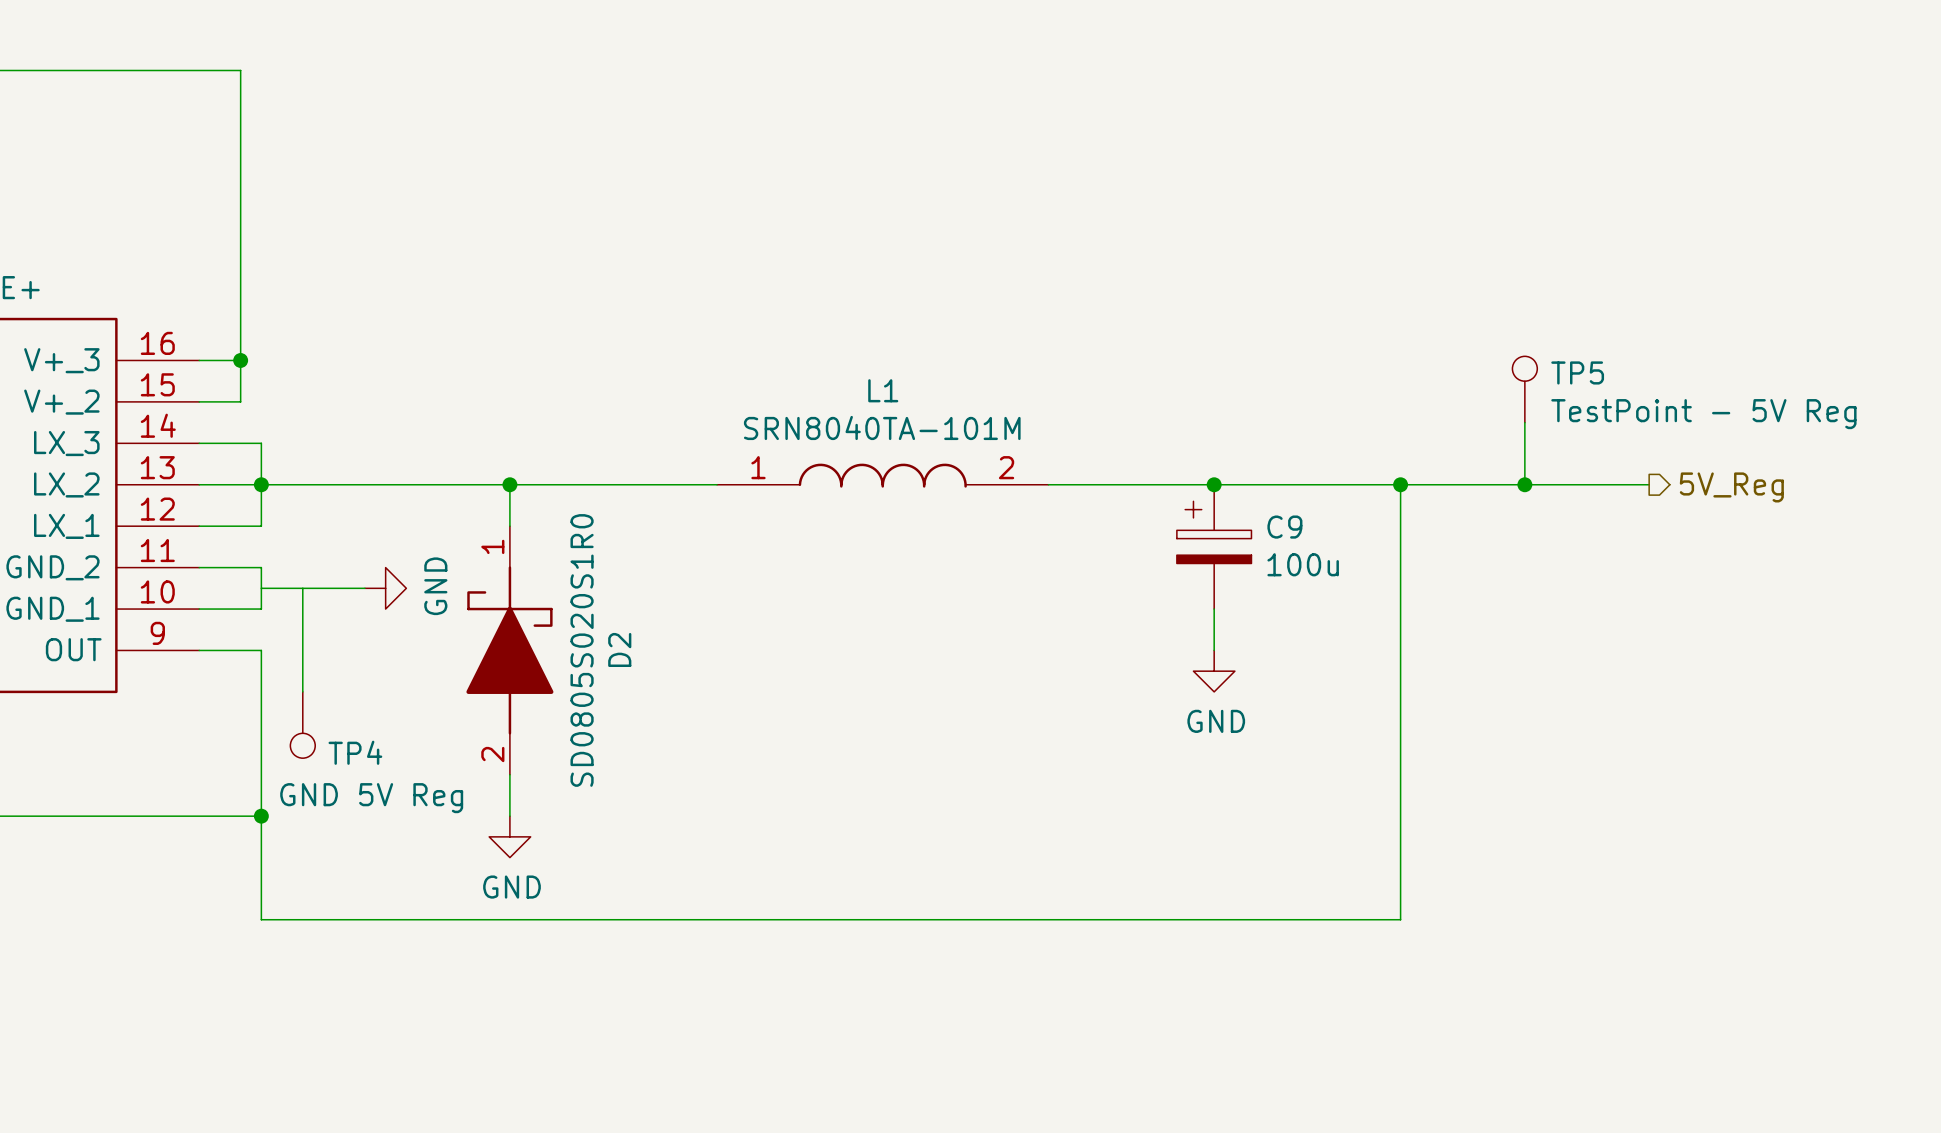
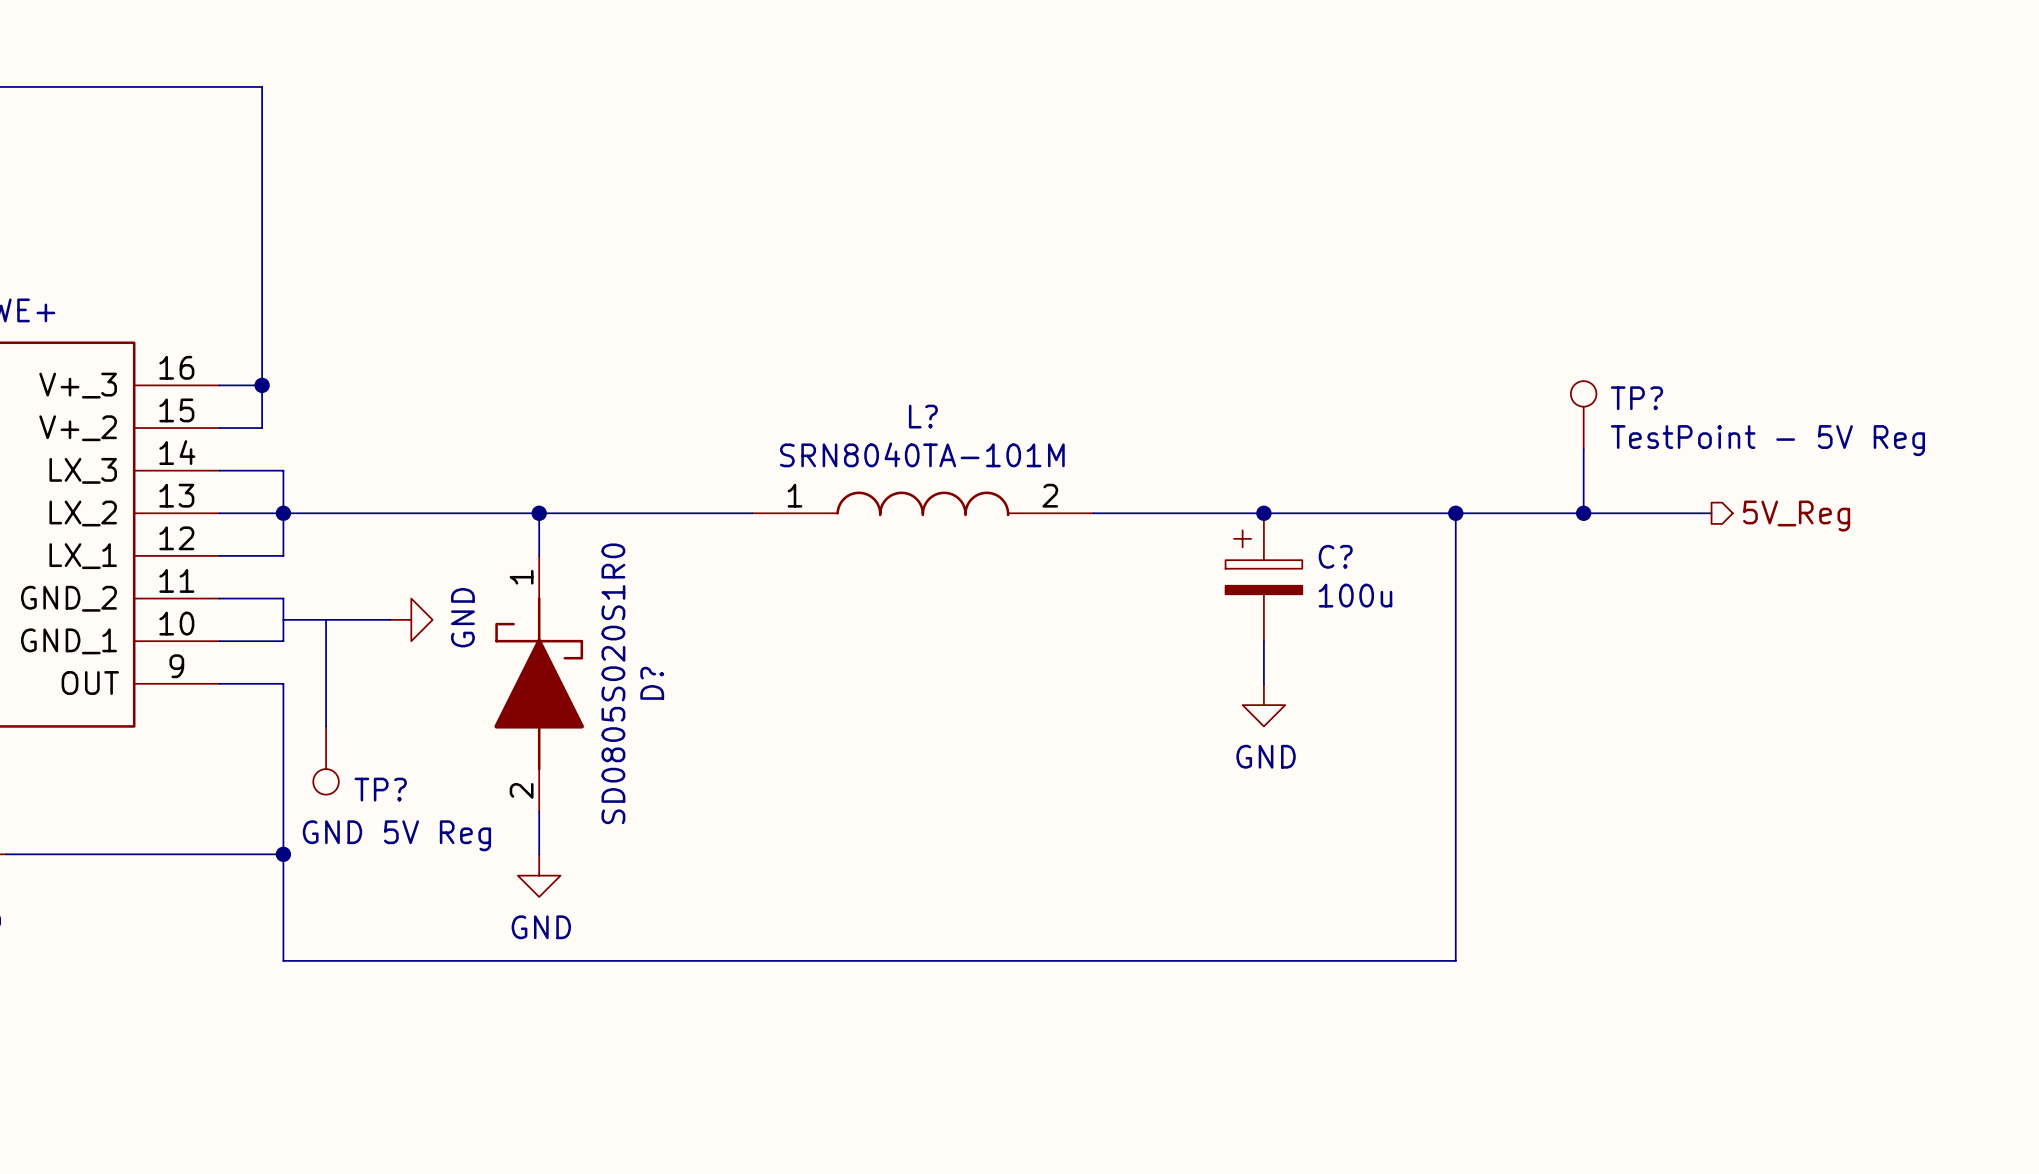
TP5 name: TP5 (1577, 372) -> TP? (1636, 398)
L1 name: L1 (883, 390) -> L? (923, 416)
C9 name: C9 (1284, 527) -> C? (1335, 556)
D2 name: D2 (619, 649) -> D? (652, 683)
TP4 name: TP4 (355, 752) -> TP? (380, 789)

